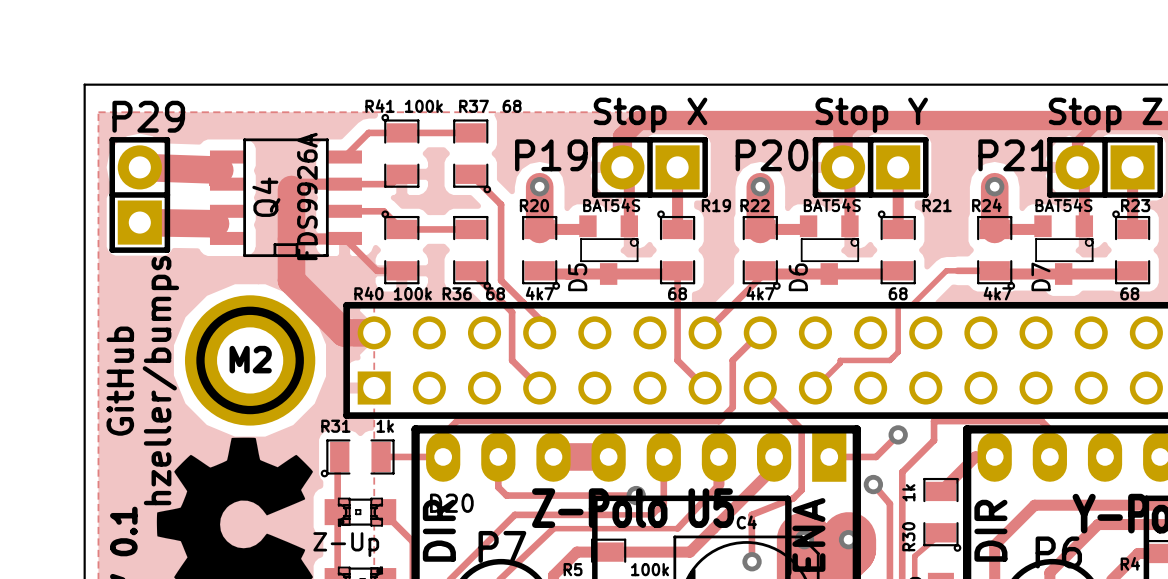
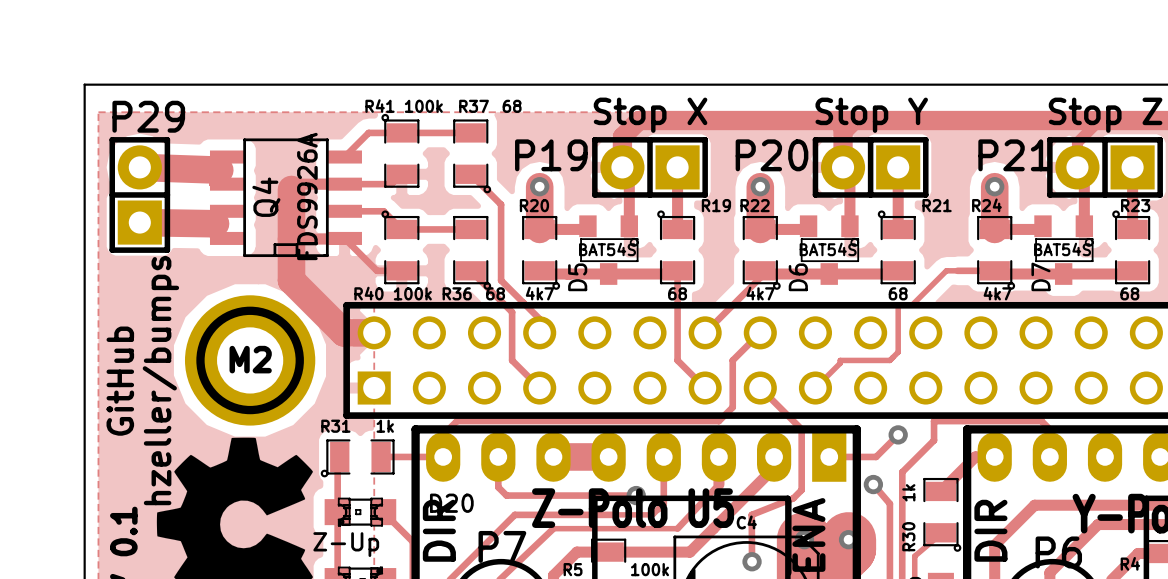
D5 value position: BAT54S (611, 205) -> BAT54S (607, 249)
D6 value position: BAT54S (832, 205) -> BAT54S (828, 249)
D7 value position: BAT54S (1063, 205) -> BAT54S (1062, 249)

